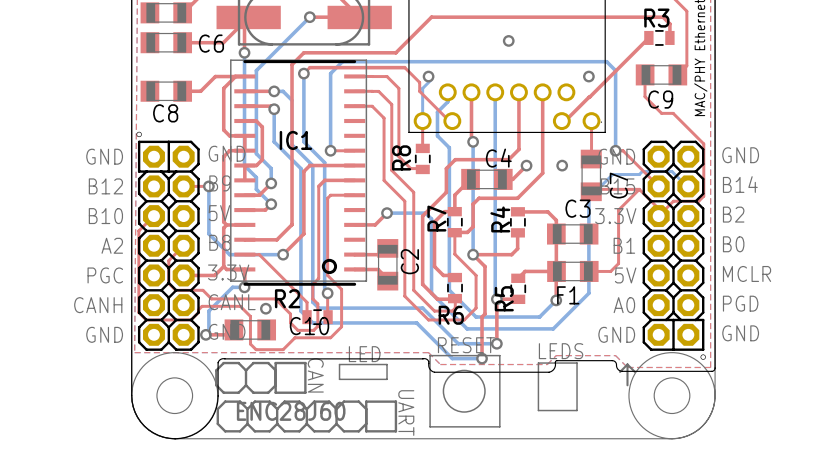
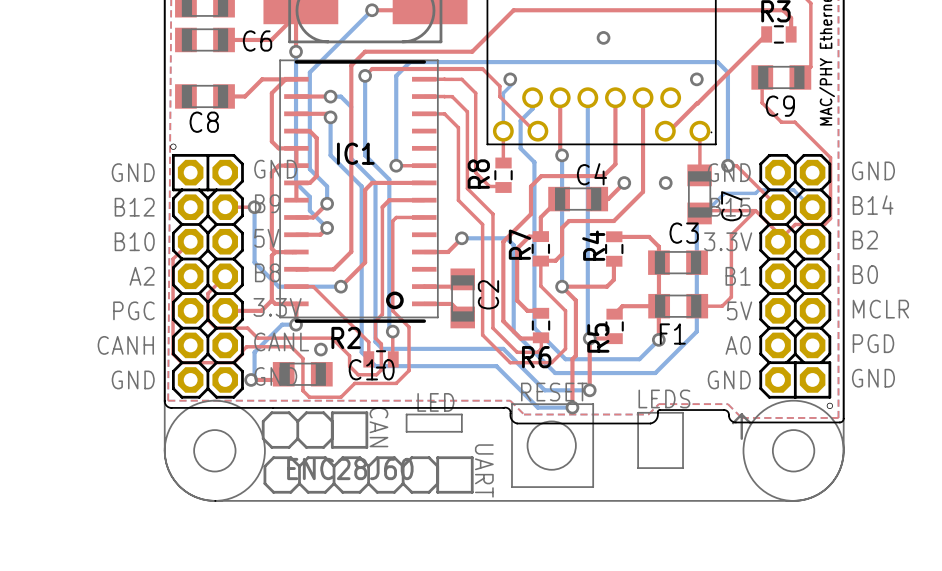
board edge: (131, 353) (132, 401) (137, 417) (153, 432) (175, 438) -> (164, 401) (166, 405) (171, 407) (273, 407)
board edge: (224, 358) (220, 359) (218, 362) (217, 401) (212, 417) (196, 433) (175, 438) -> none

